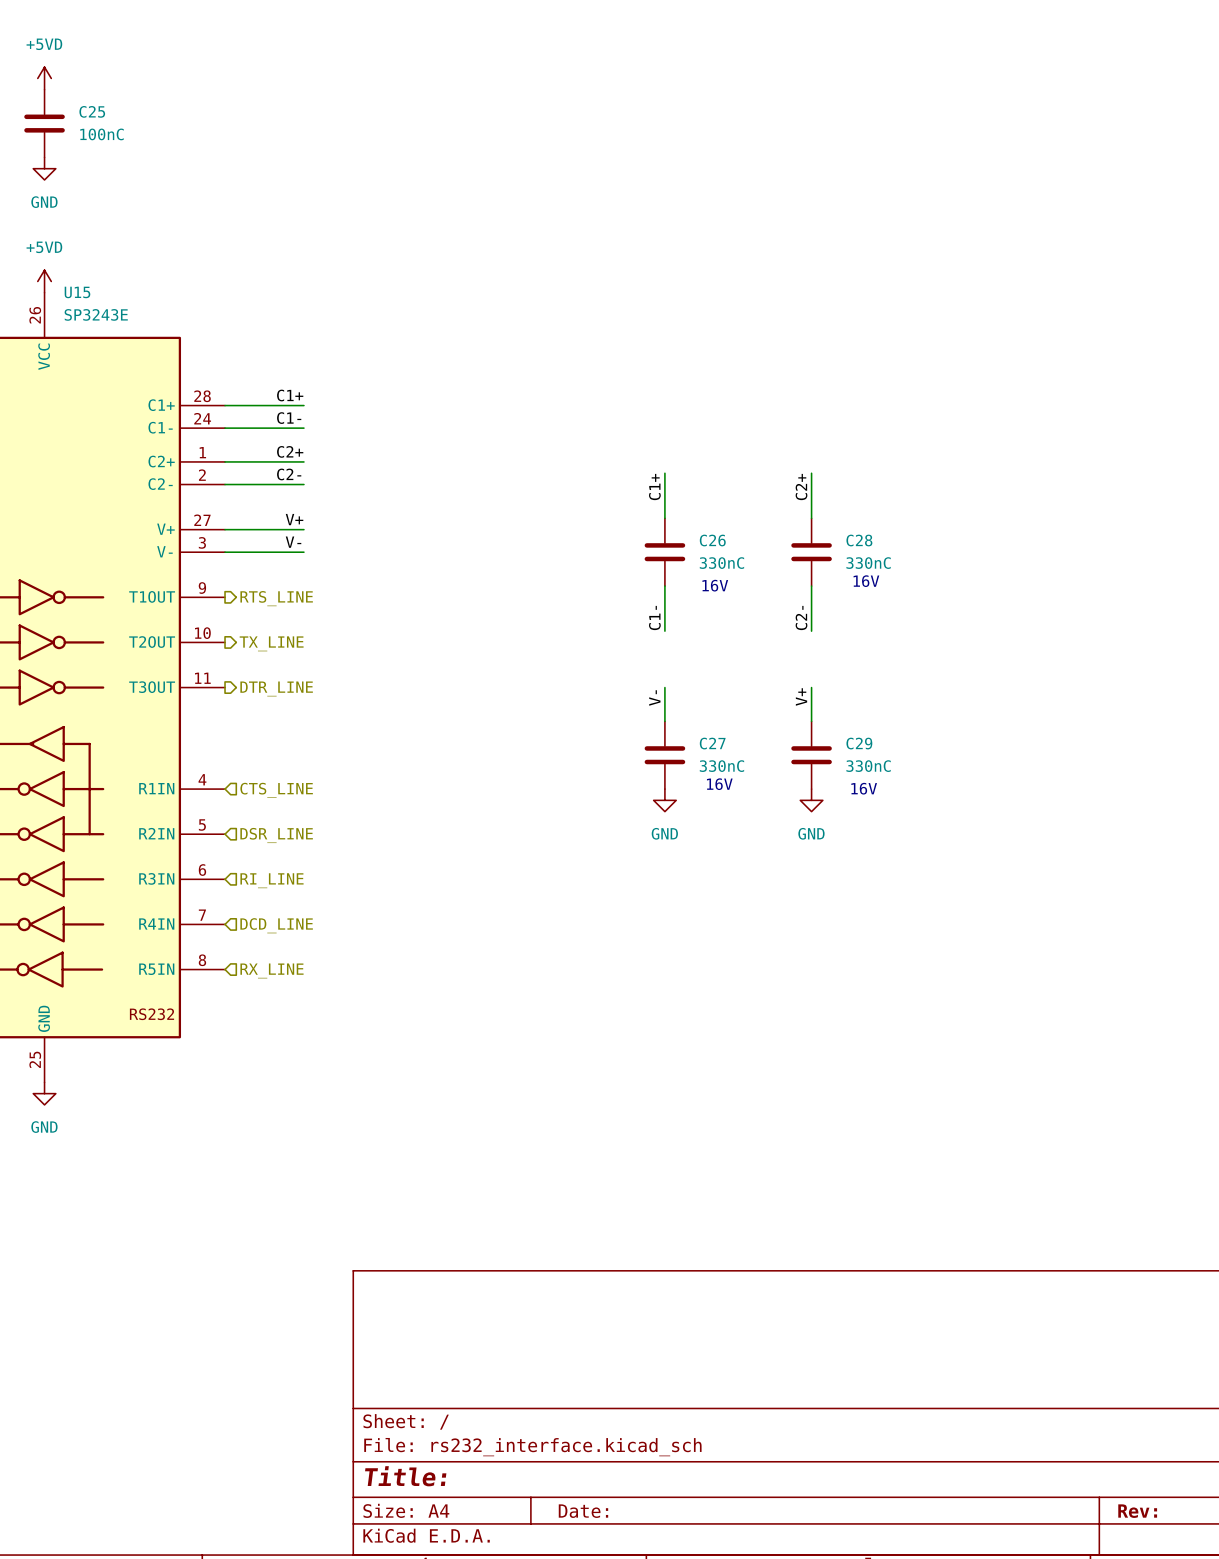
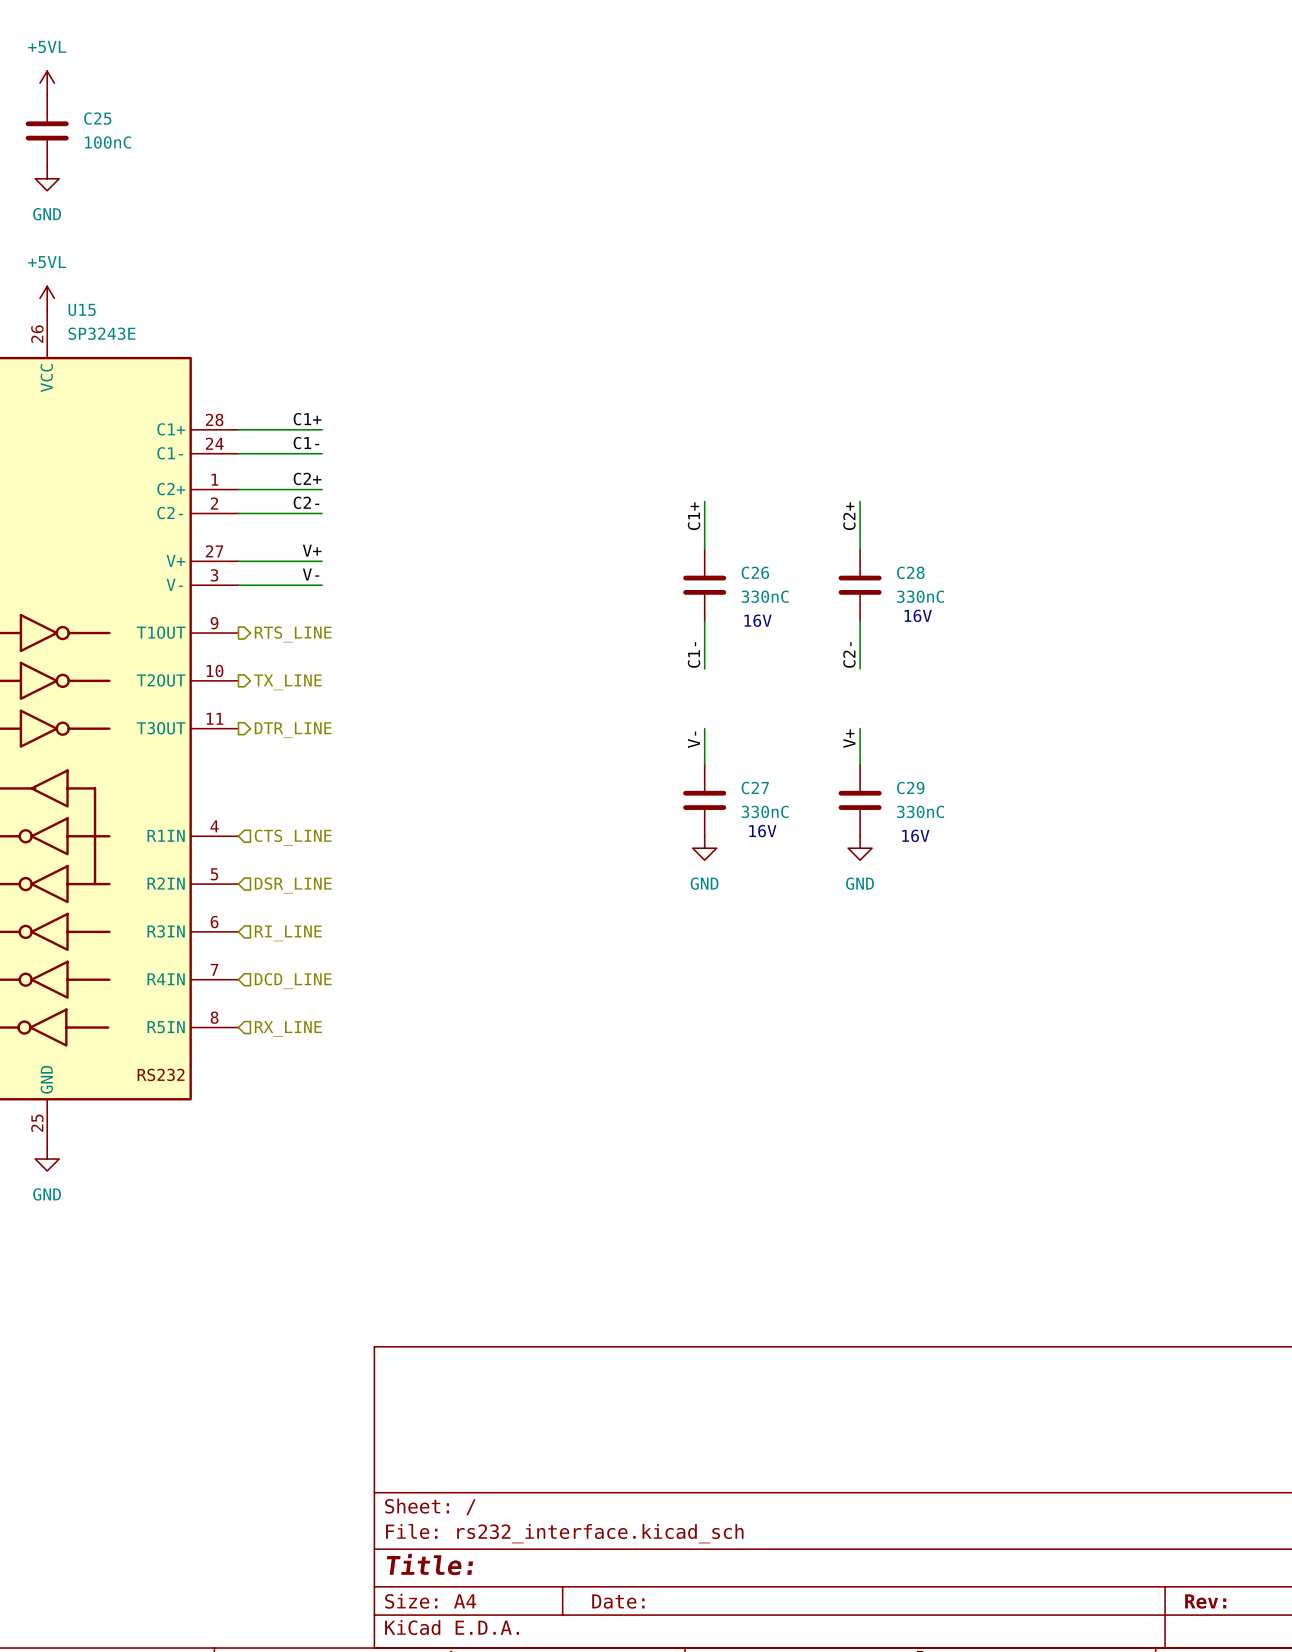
power symbol: +5VD (44, 78) -> +5VL (47, 83)
power symbol: +5VD (44, 281) -> +5VL (47, 298)

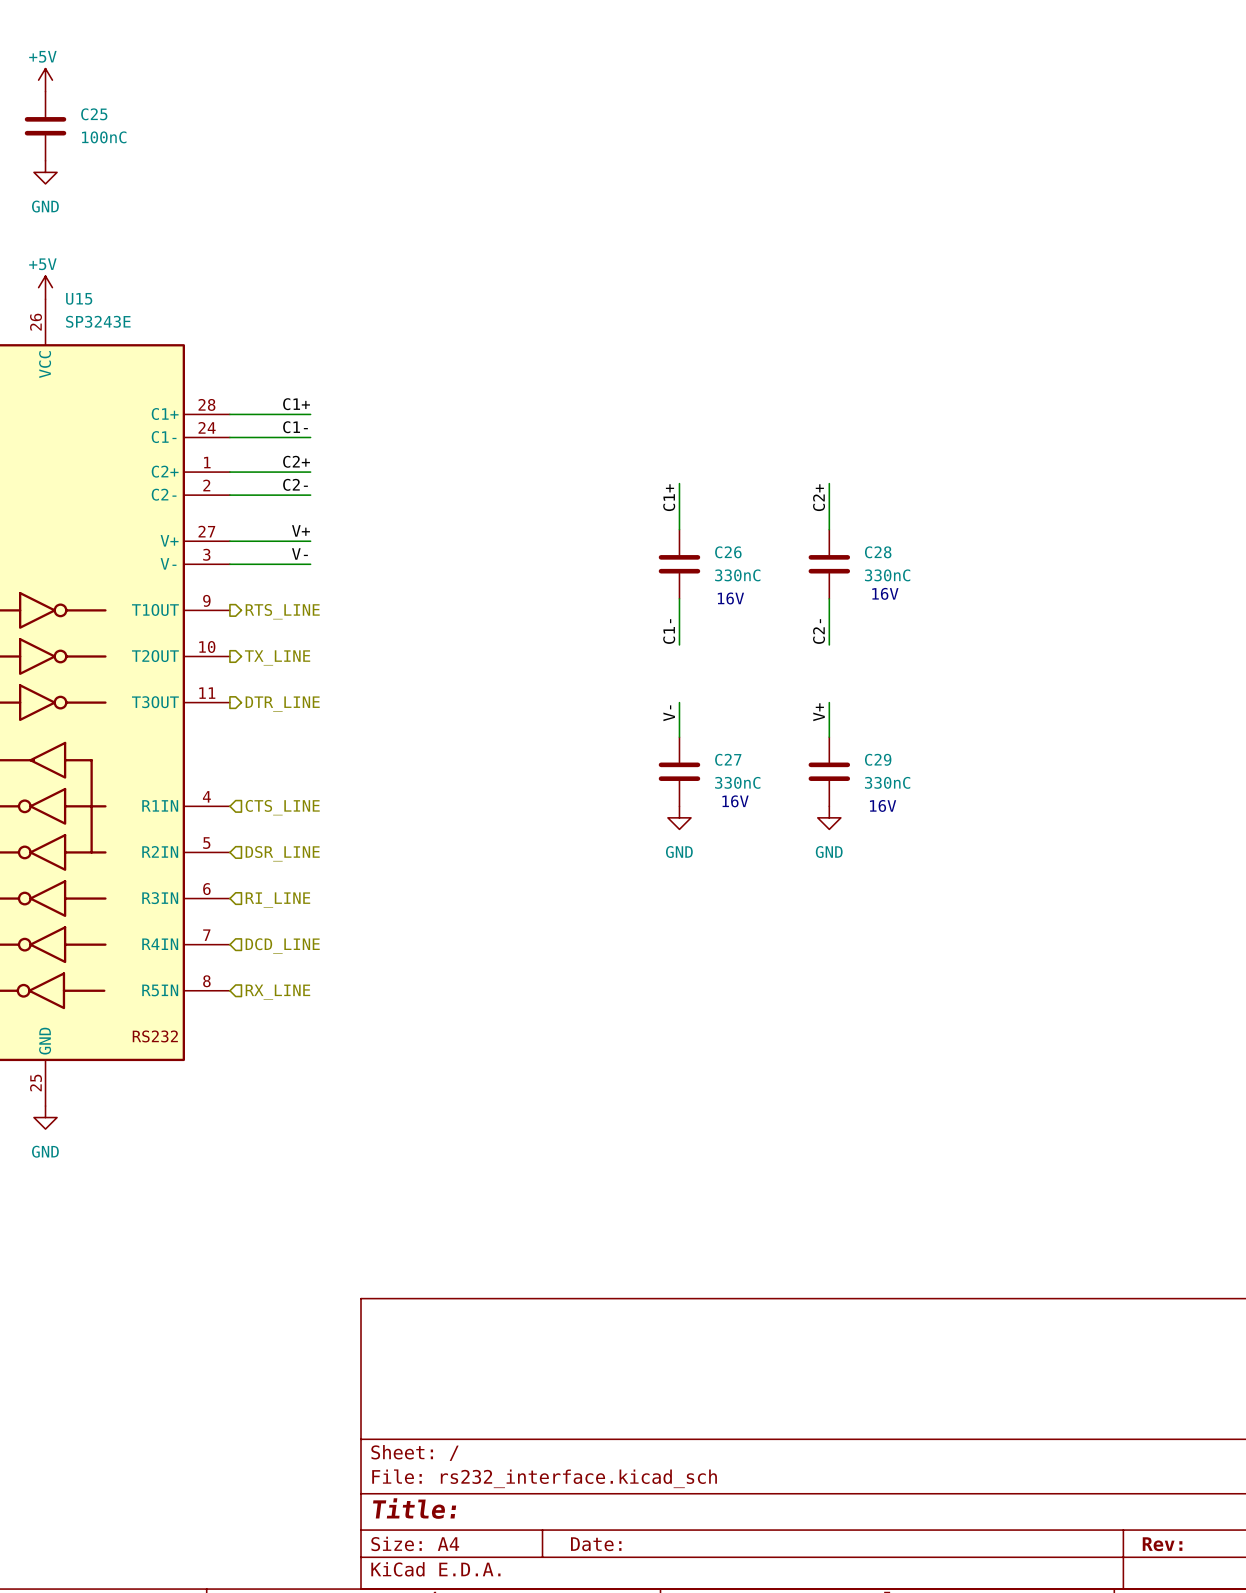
power symbol: +5VL (47, 83) -> +5V (45, 80)
power symbol: +5VL (47, 298) -> +5V (45, 287)

